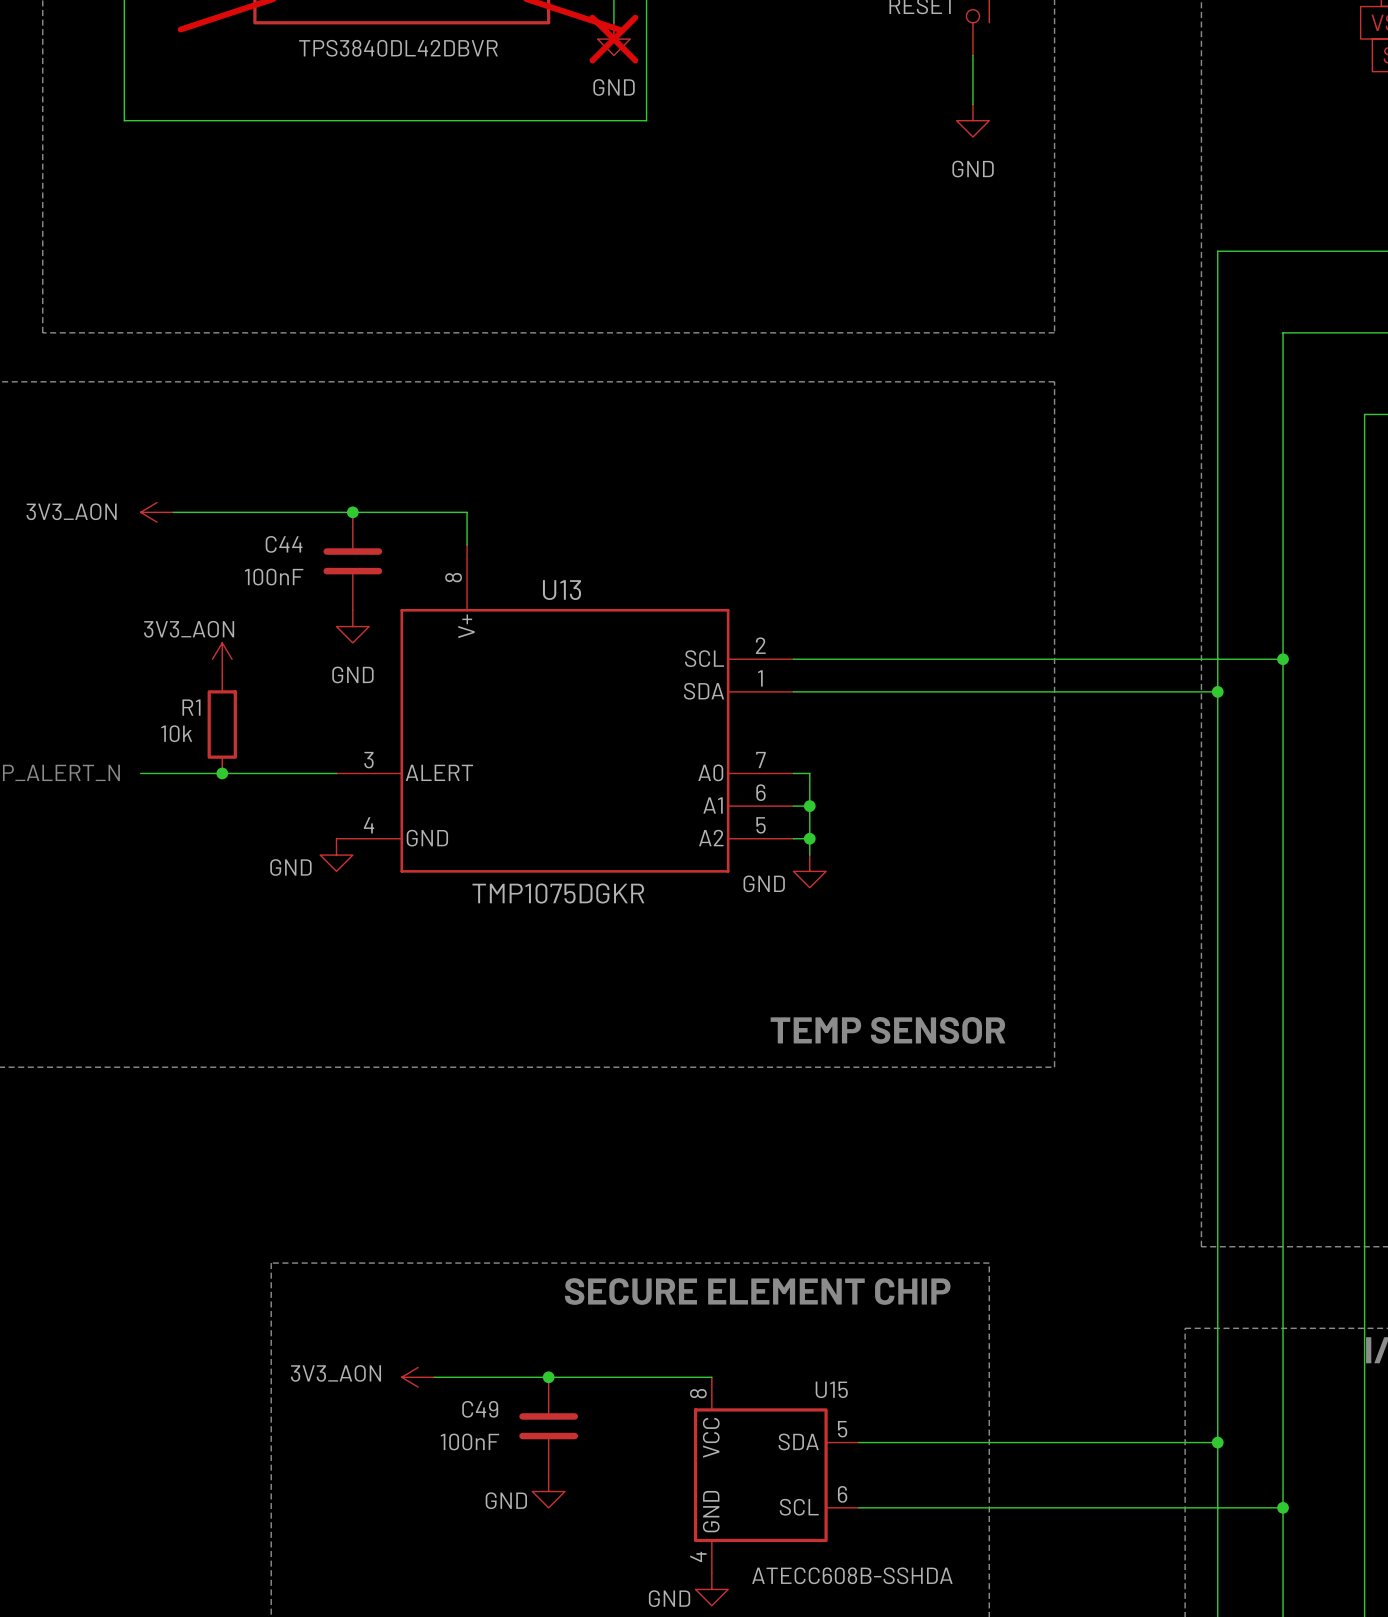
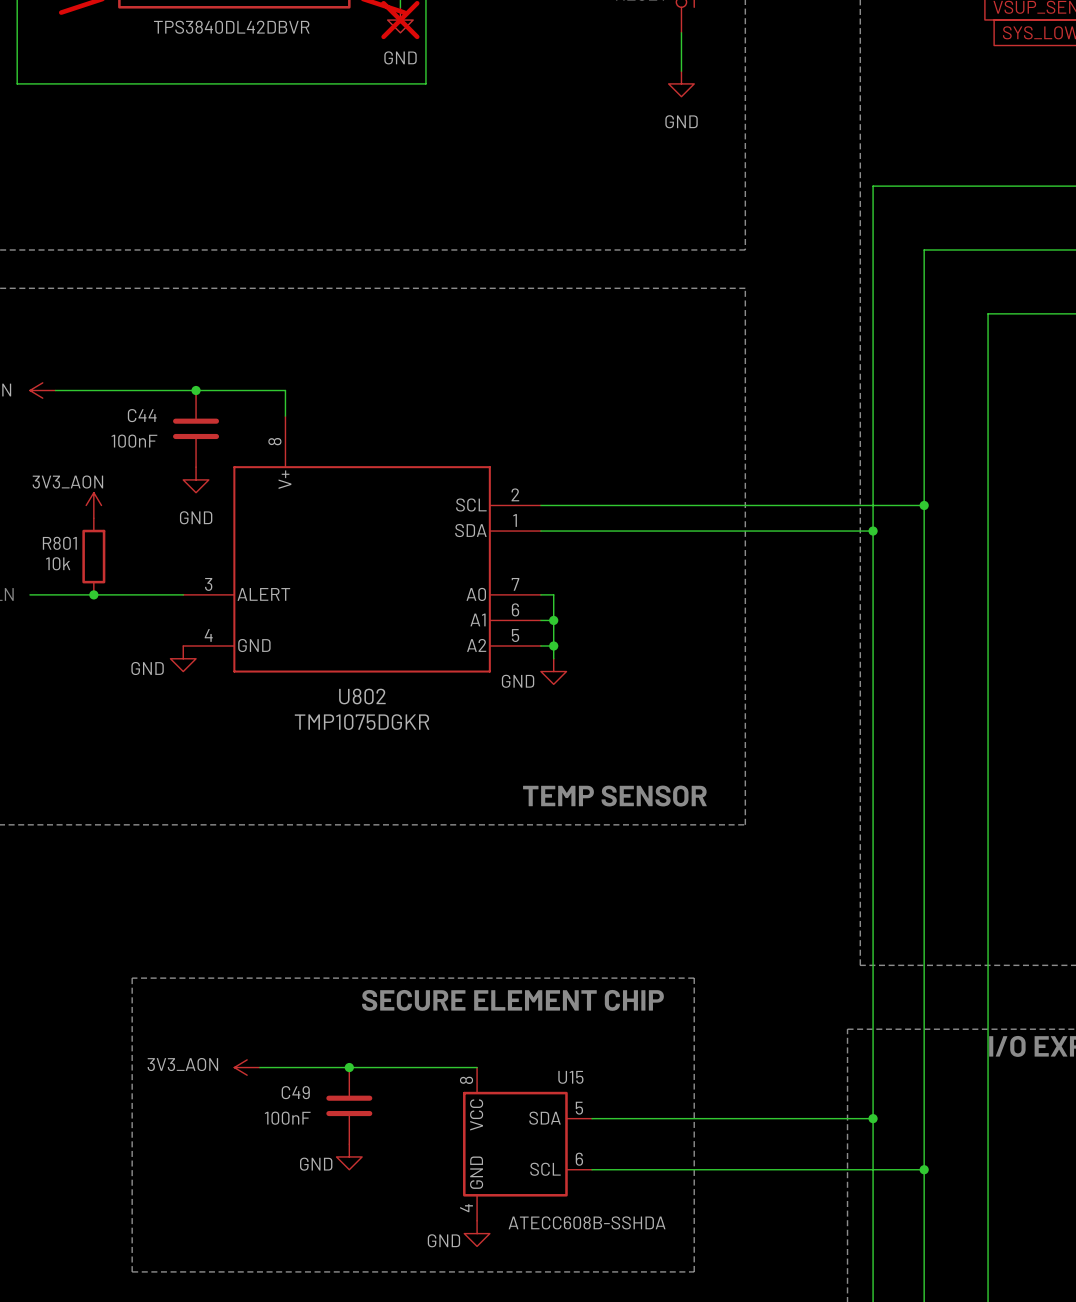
U13 name: U13 (562, 590) -> U802 (362, 696)
R1 name: R1 (191, 707) -> R801 (59, 543)
U13 value position: TMP1075DGKR (558, 893) -> TMP1075DGKR (362, 722)

